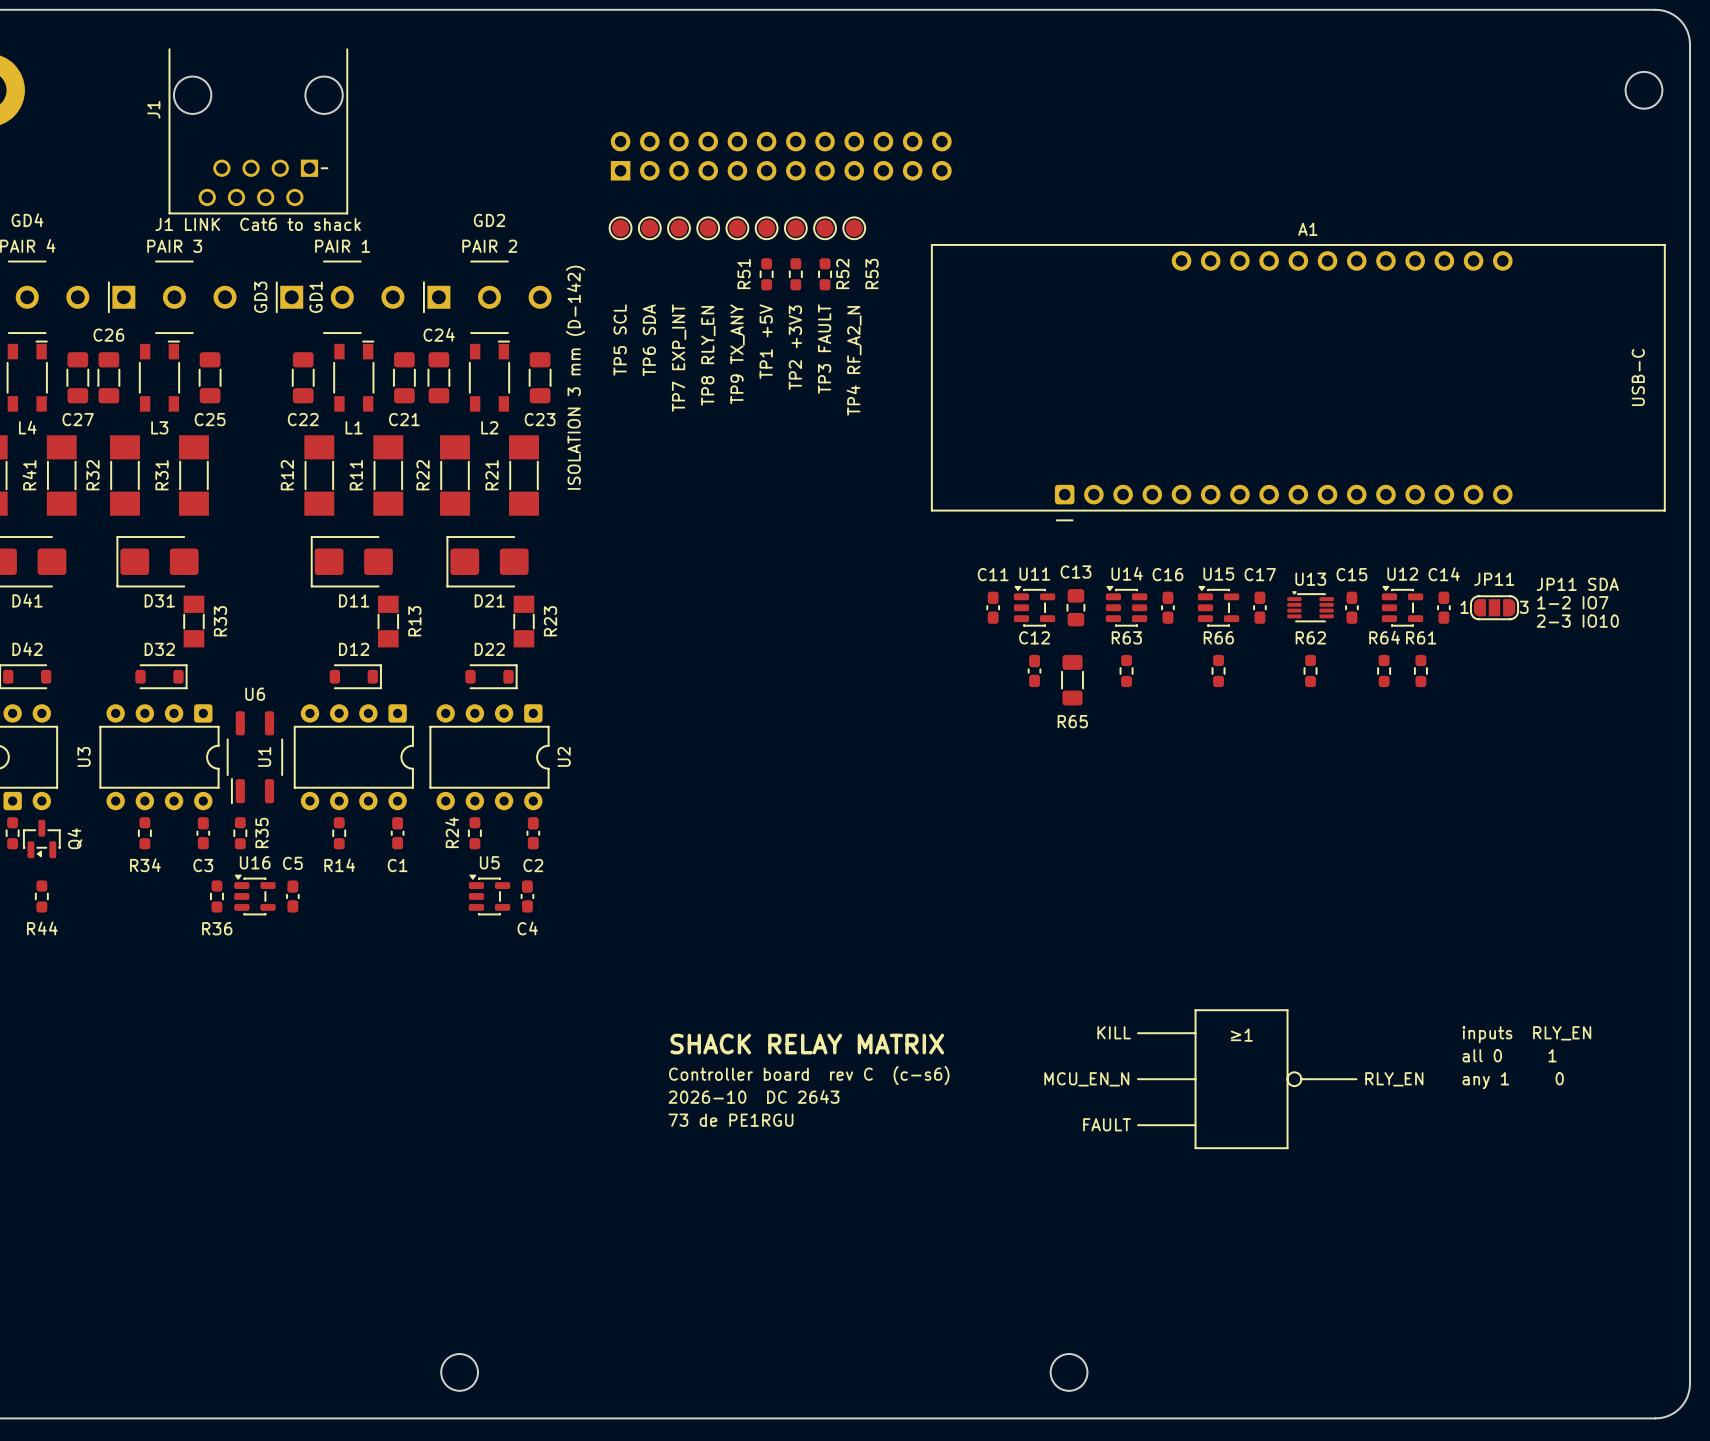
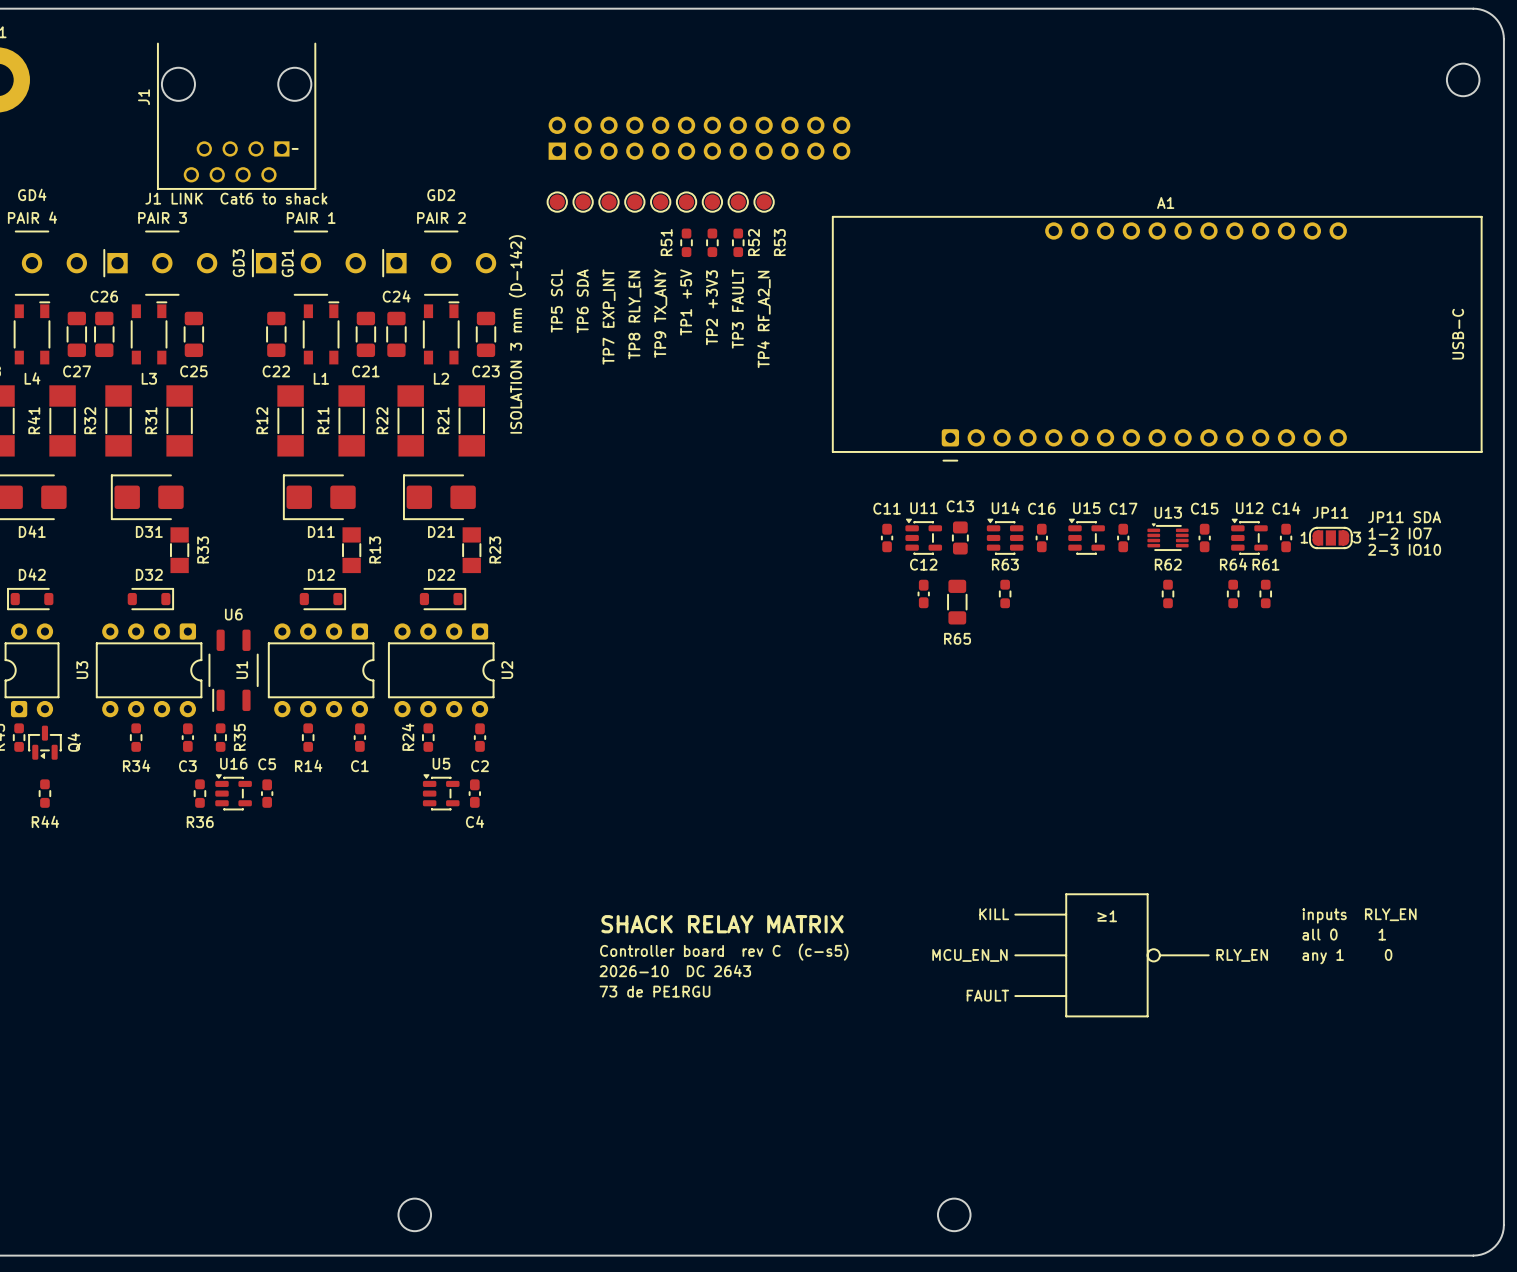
R66: (1218, 670) -> none
text: Controller board rev C (c-s6) (809, 1075) -> Controller board rev C (c-s5) (724, 952)

